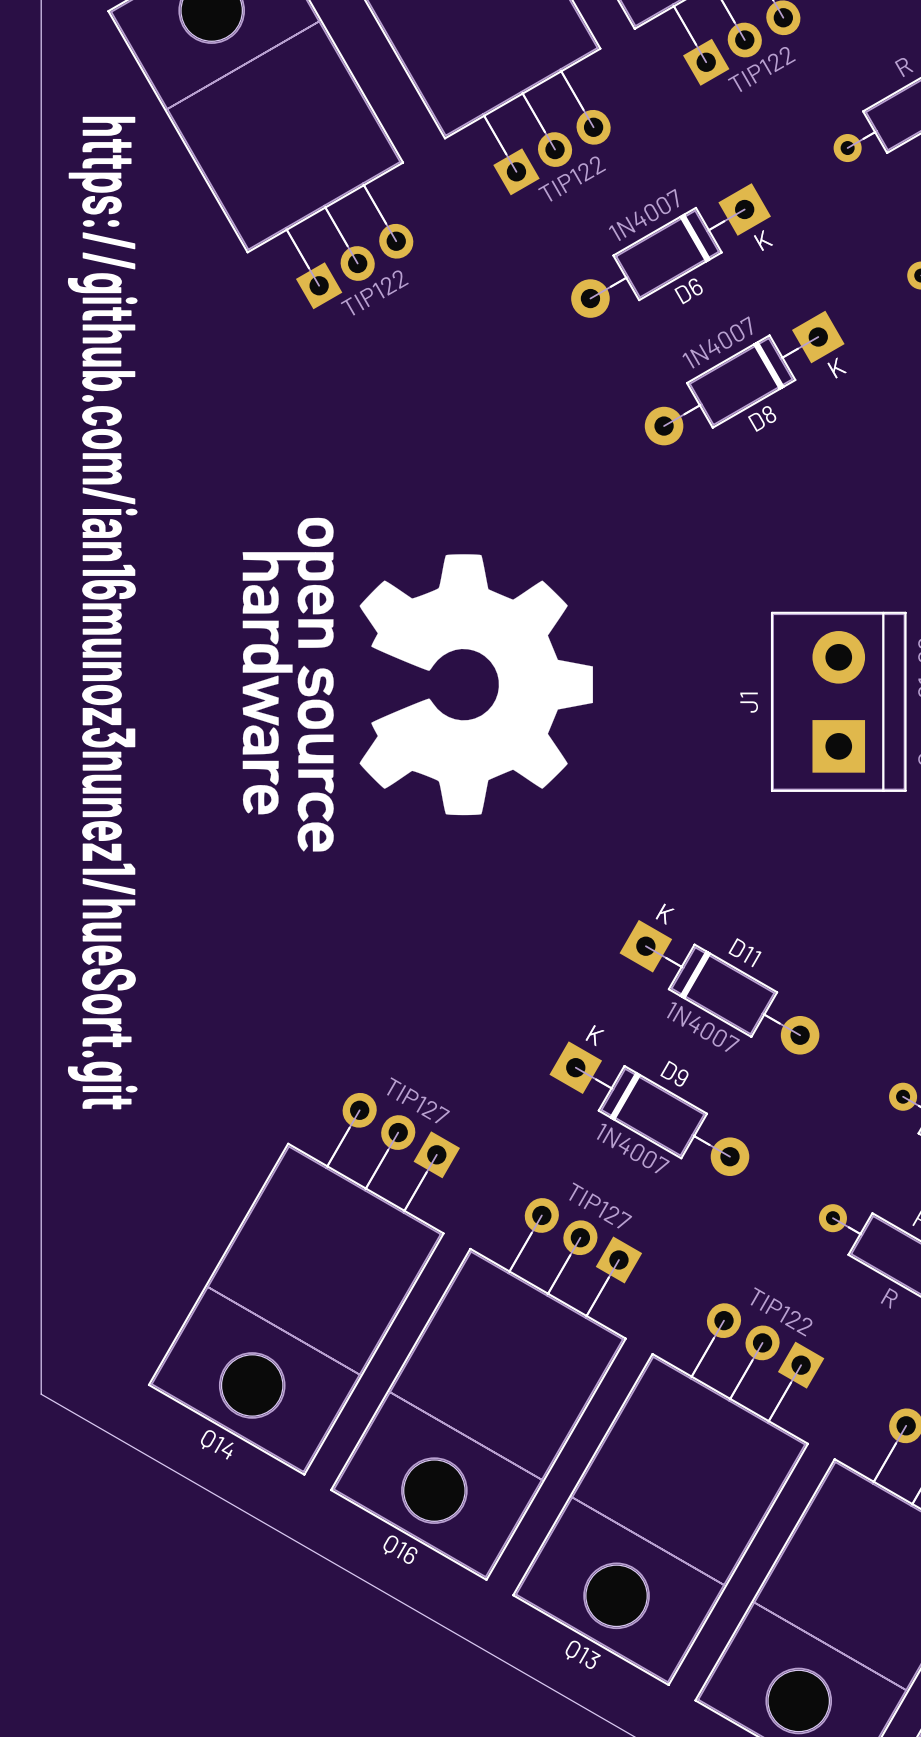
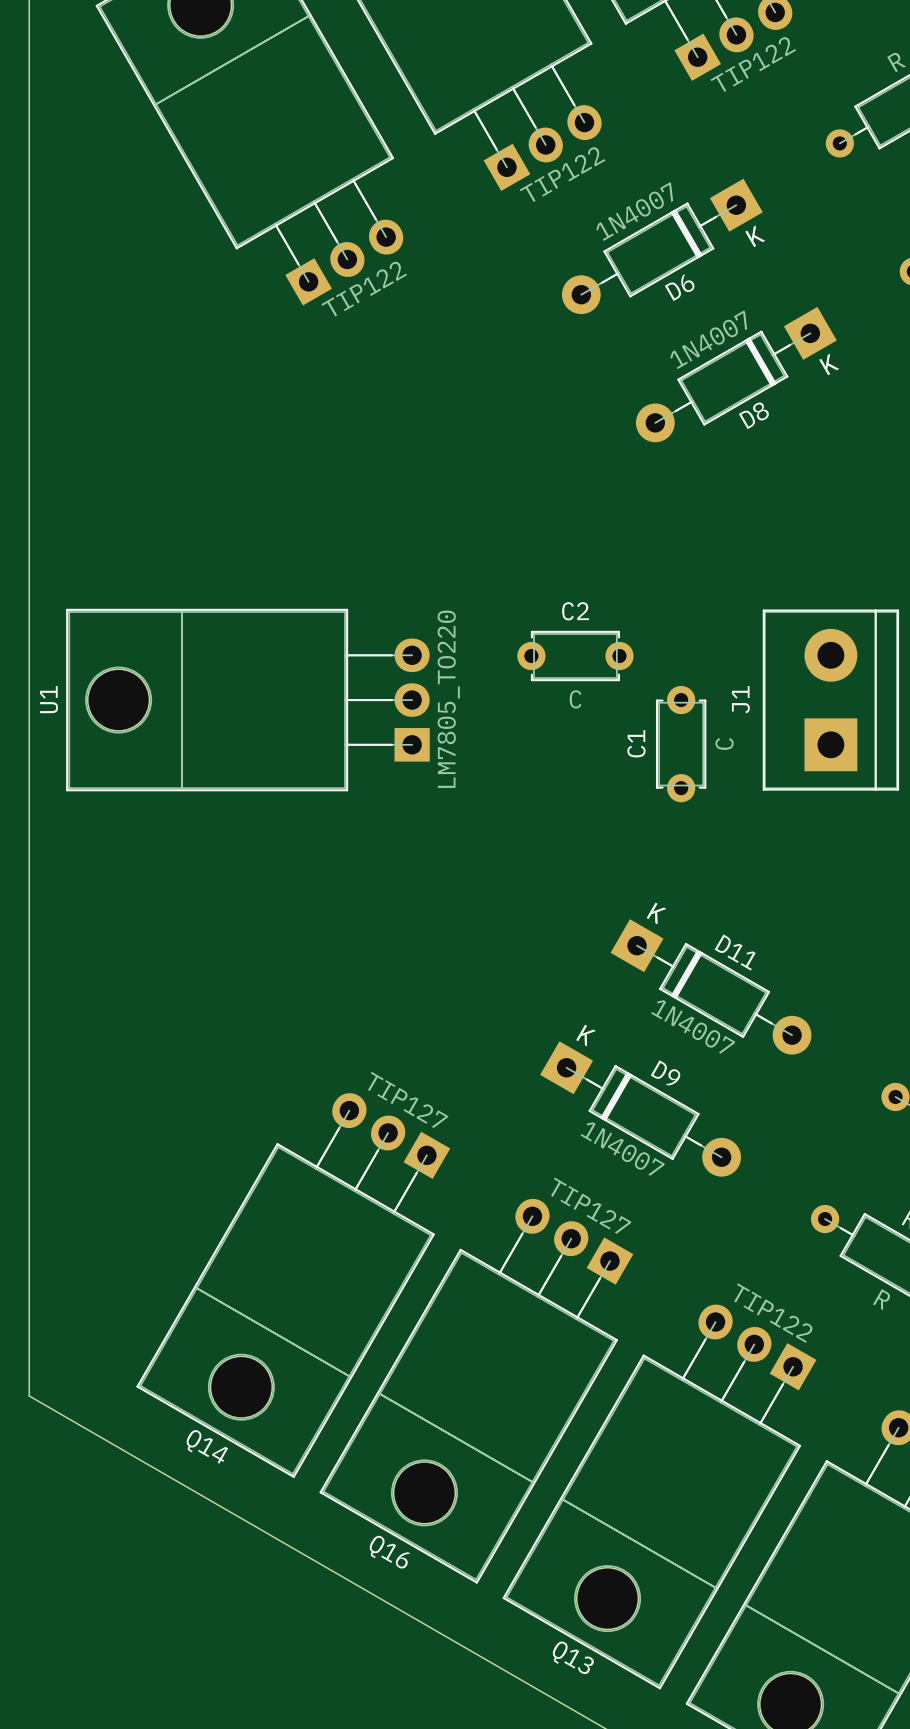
drawing: [242, 517, 593, 852] -> none
text: https://github.com/ian16munoz3nunez1/hueSort.git (102, 613) -> none
C2: none -> C (575, 656)
U1: none -> LM7805_TO220 (247, 700)
C1: none -> C (681, 744)

